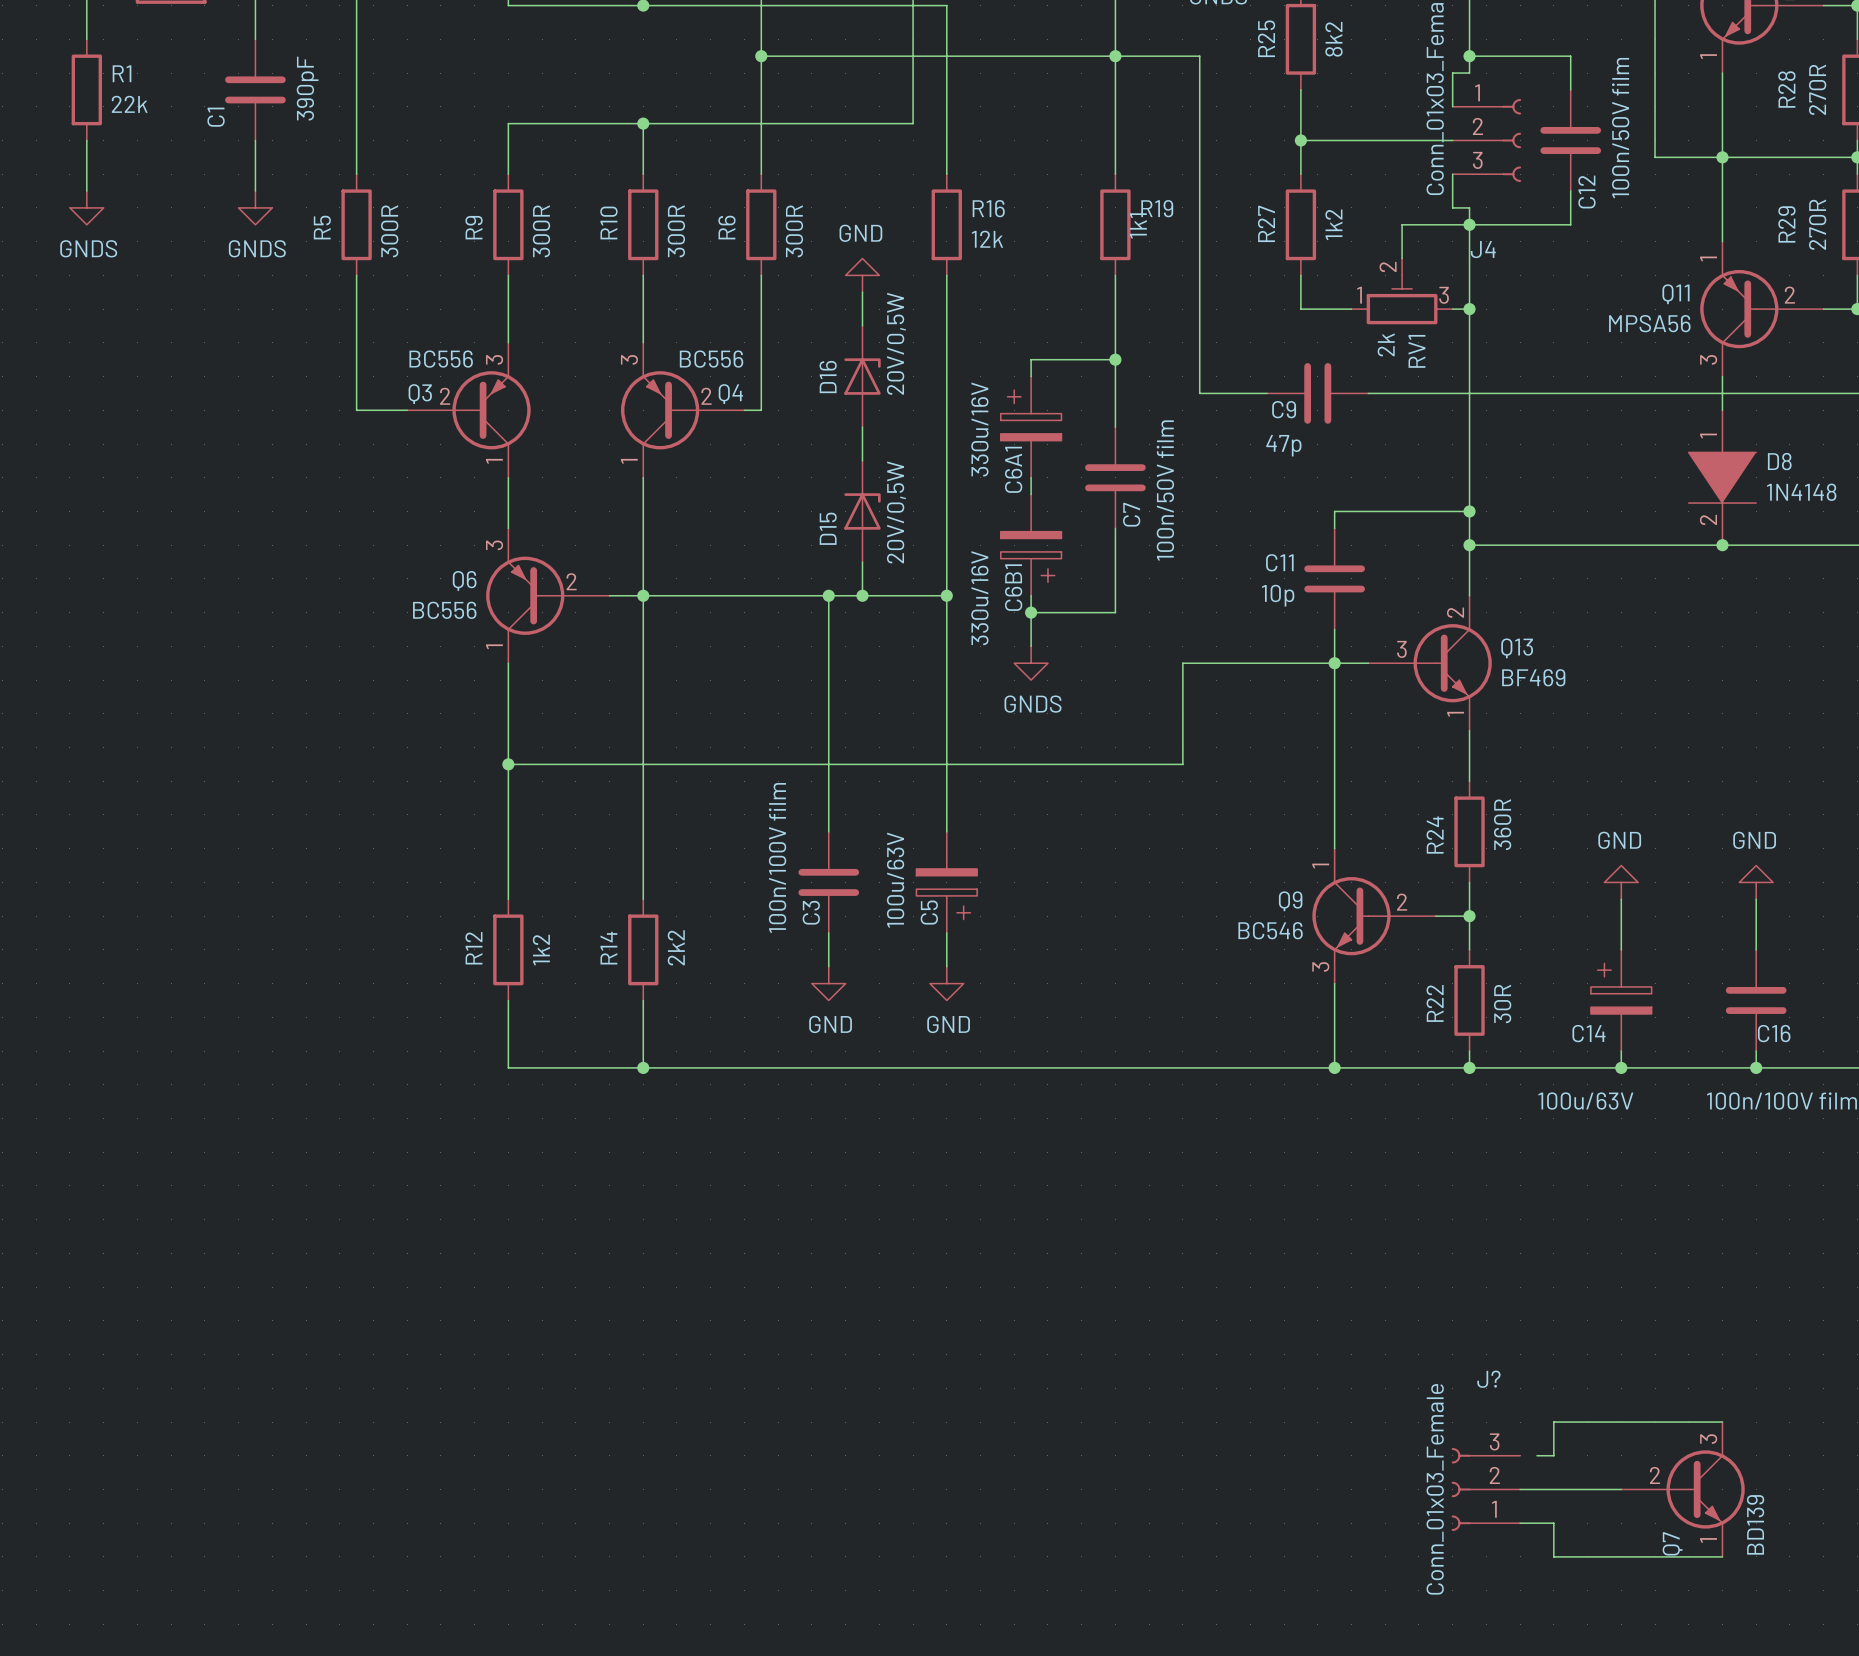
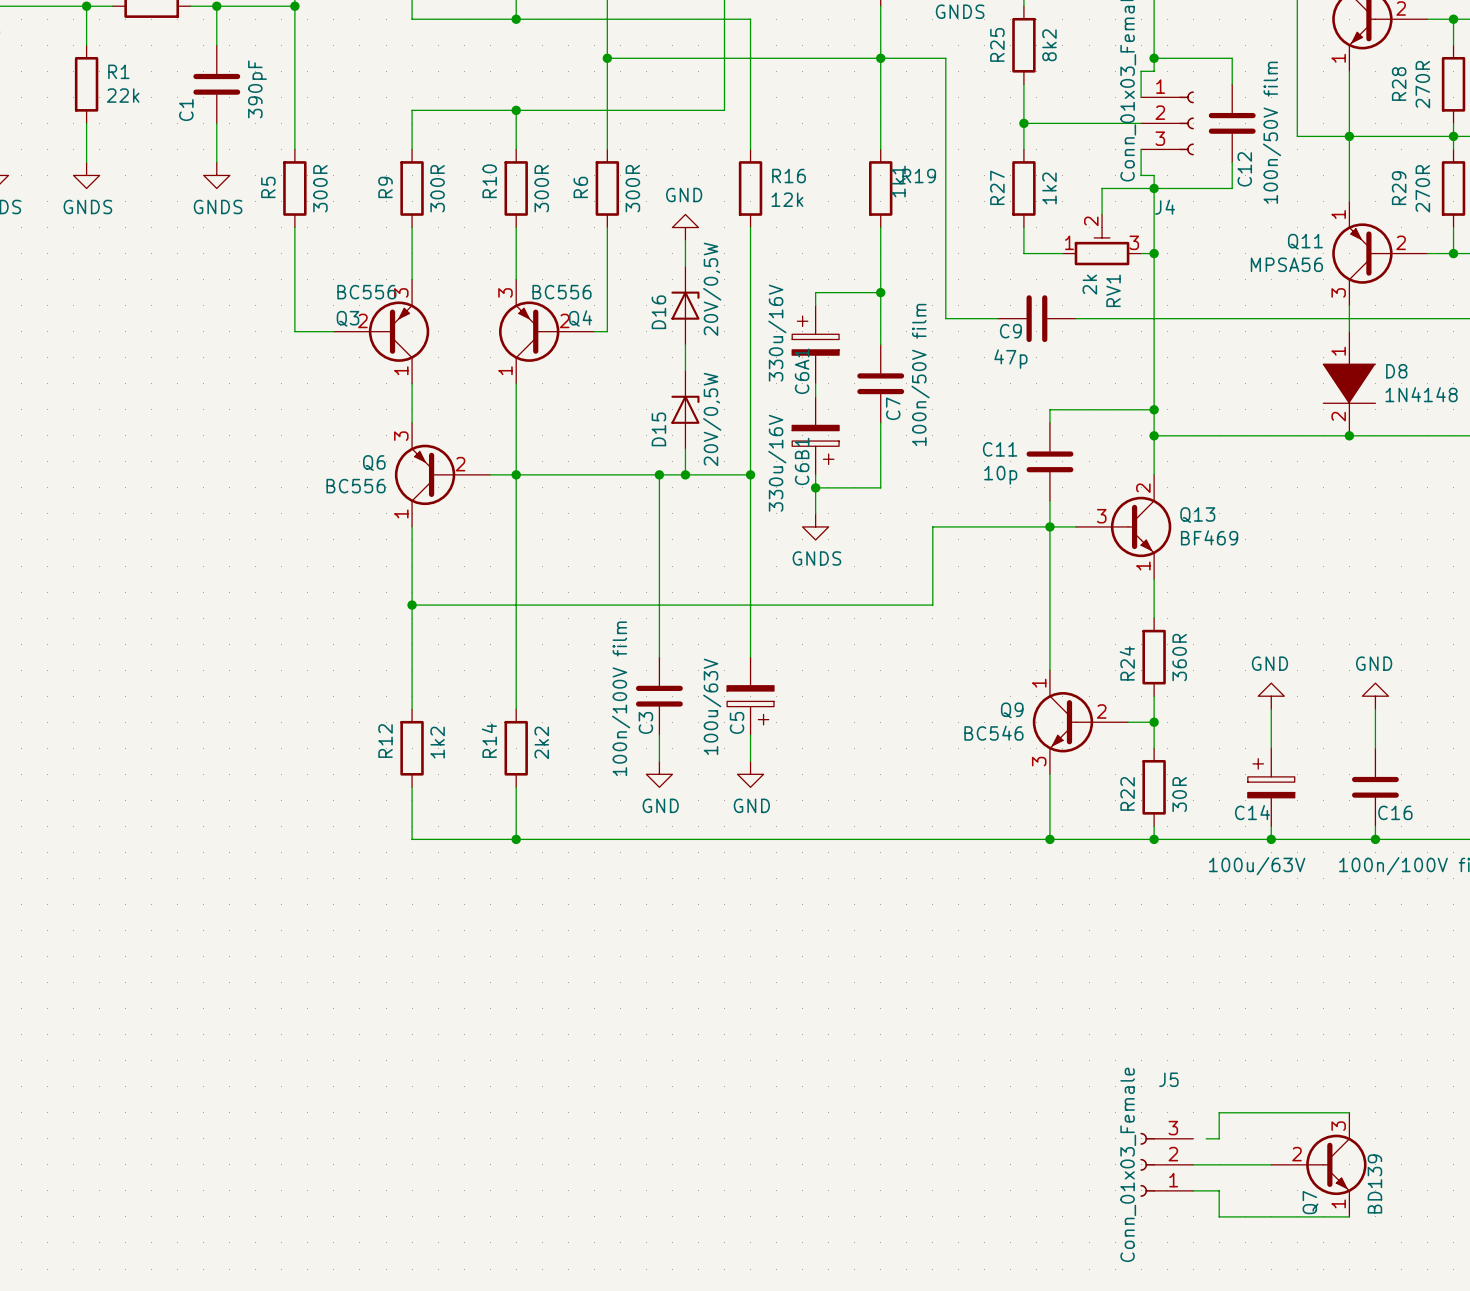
J? name: J? (1488, 1379) -> J5 (1168, 1079)

